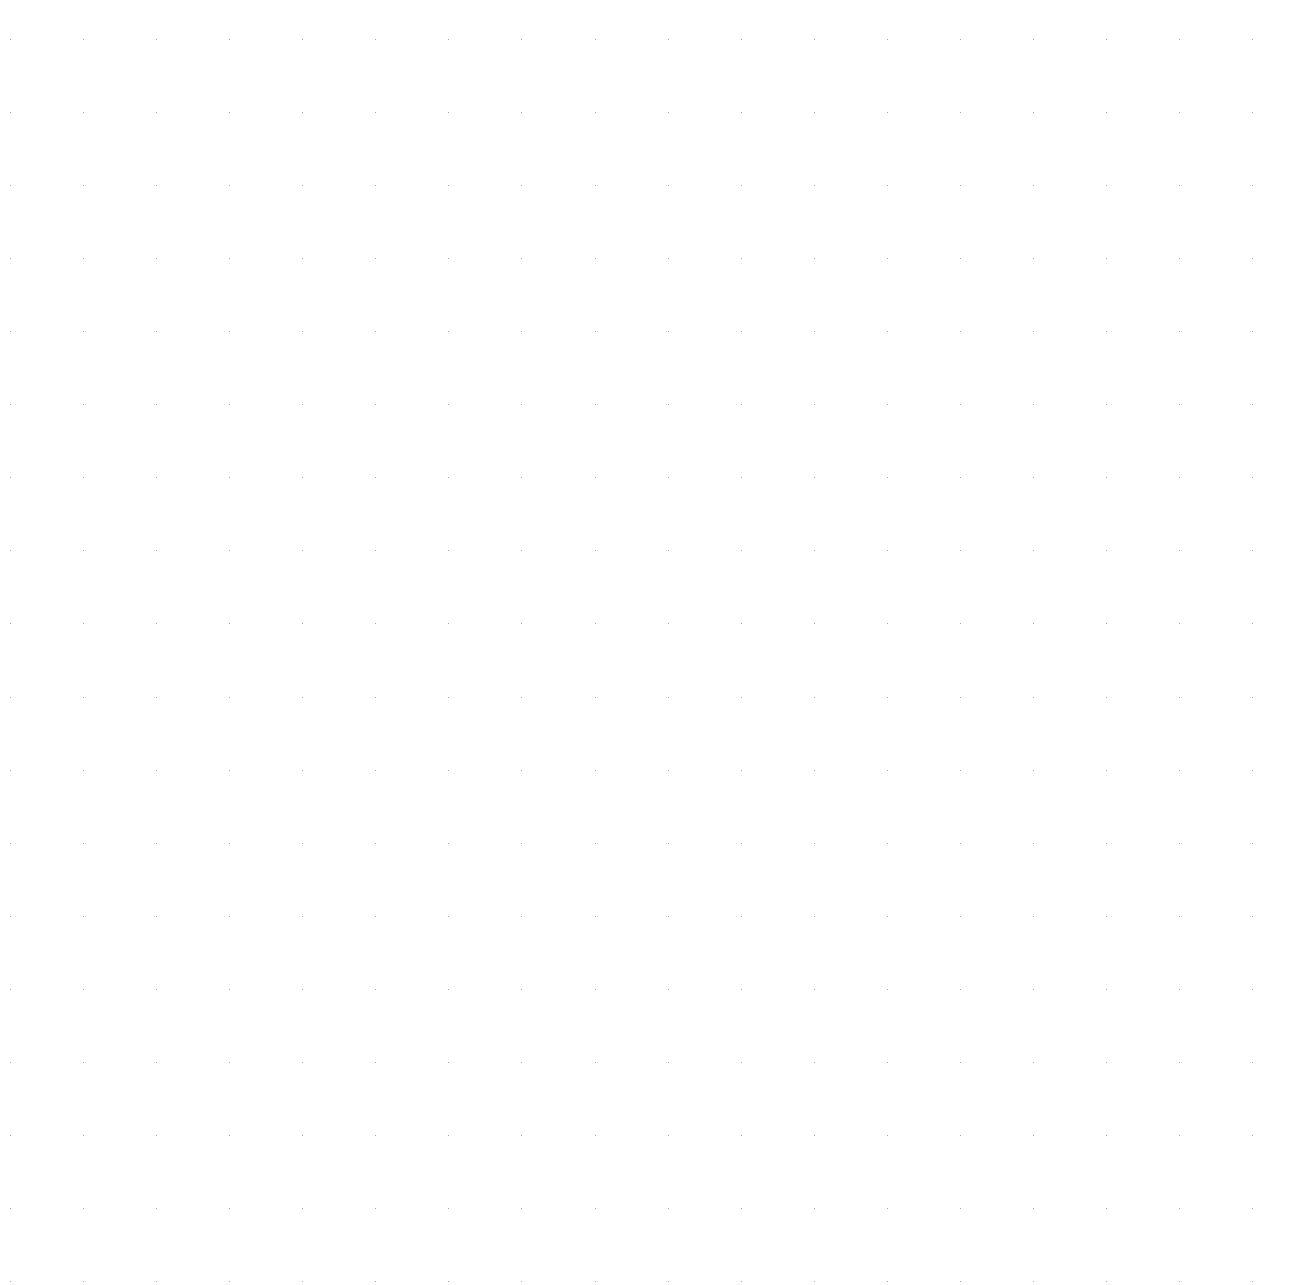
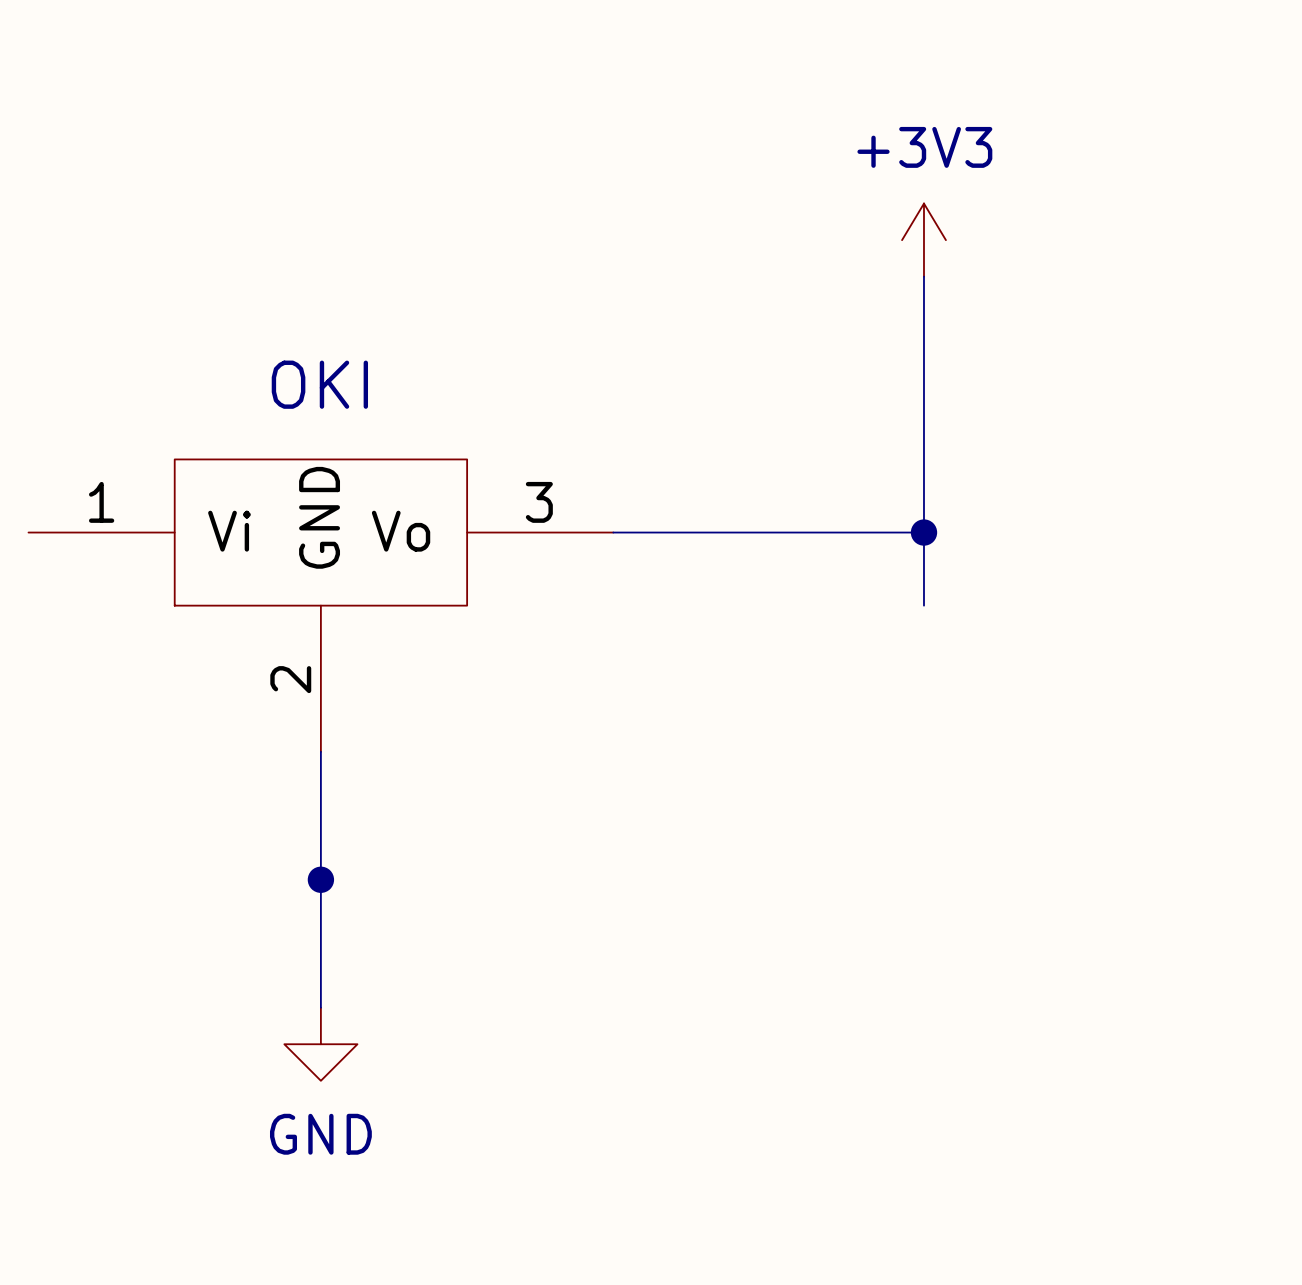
power symbol: none -> +3V3 (923, 240)
wire: none -> (923, 276) (923, 605)
wire: none -> (613, 532) (923, 532)
junction: none -> (923, 532)
part: none -> OKI (320, 605)
wire: none -> (320, 751) (320, 1007)
junction: none -> (320, 879)
power symbol: none -> GND (320, 1044)

